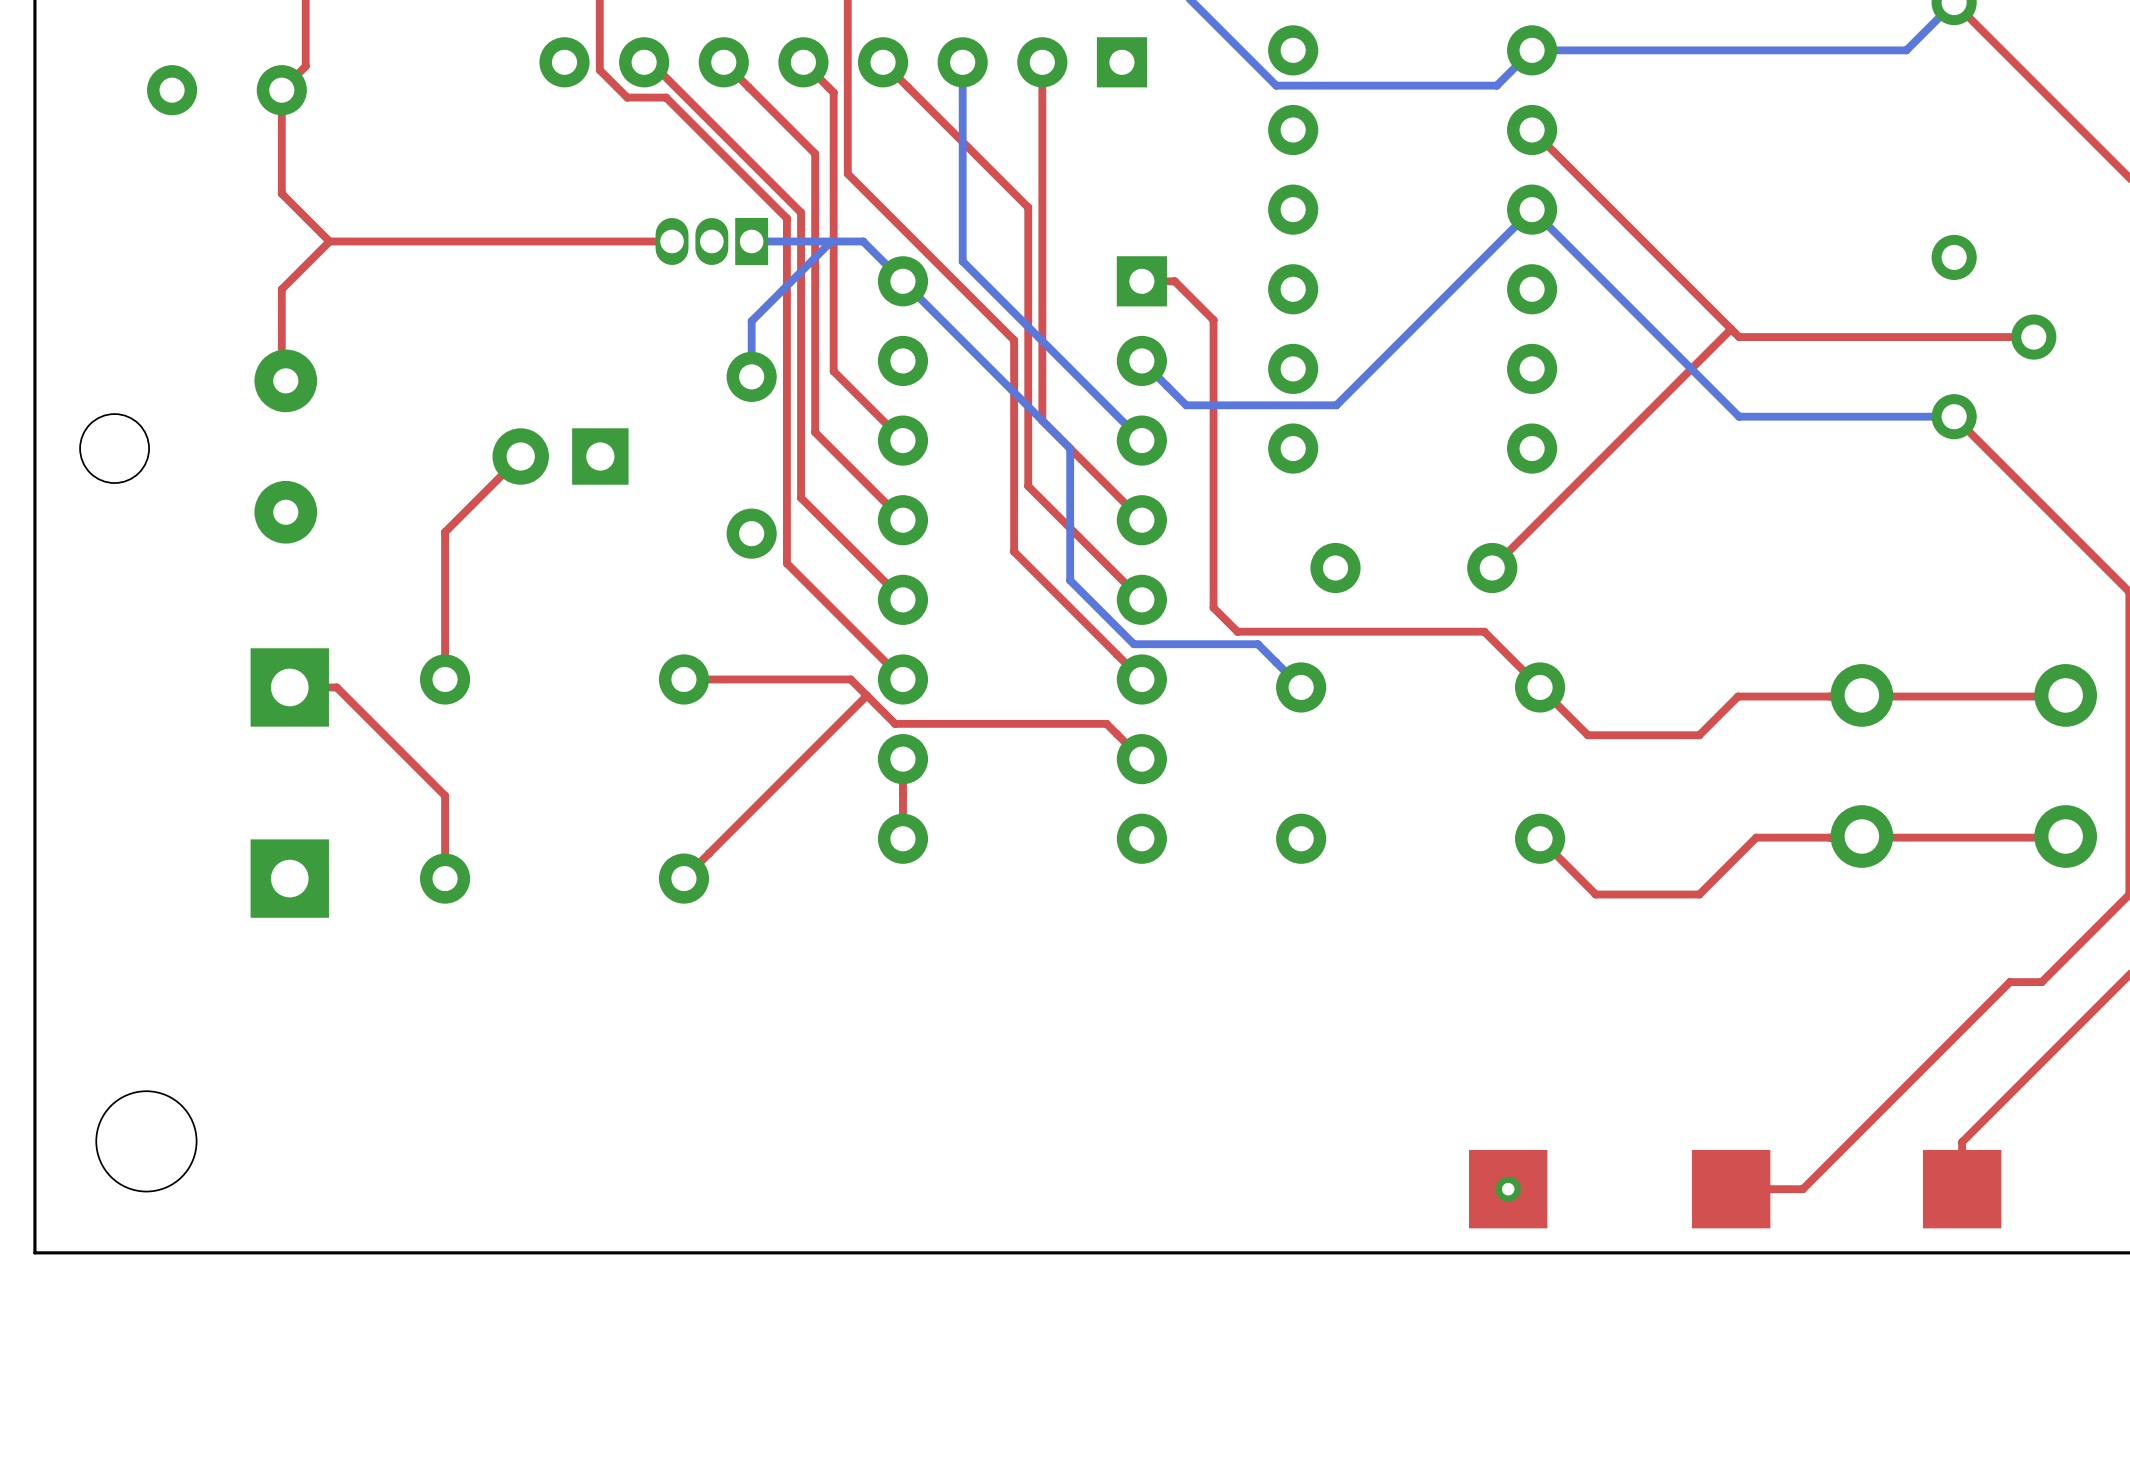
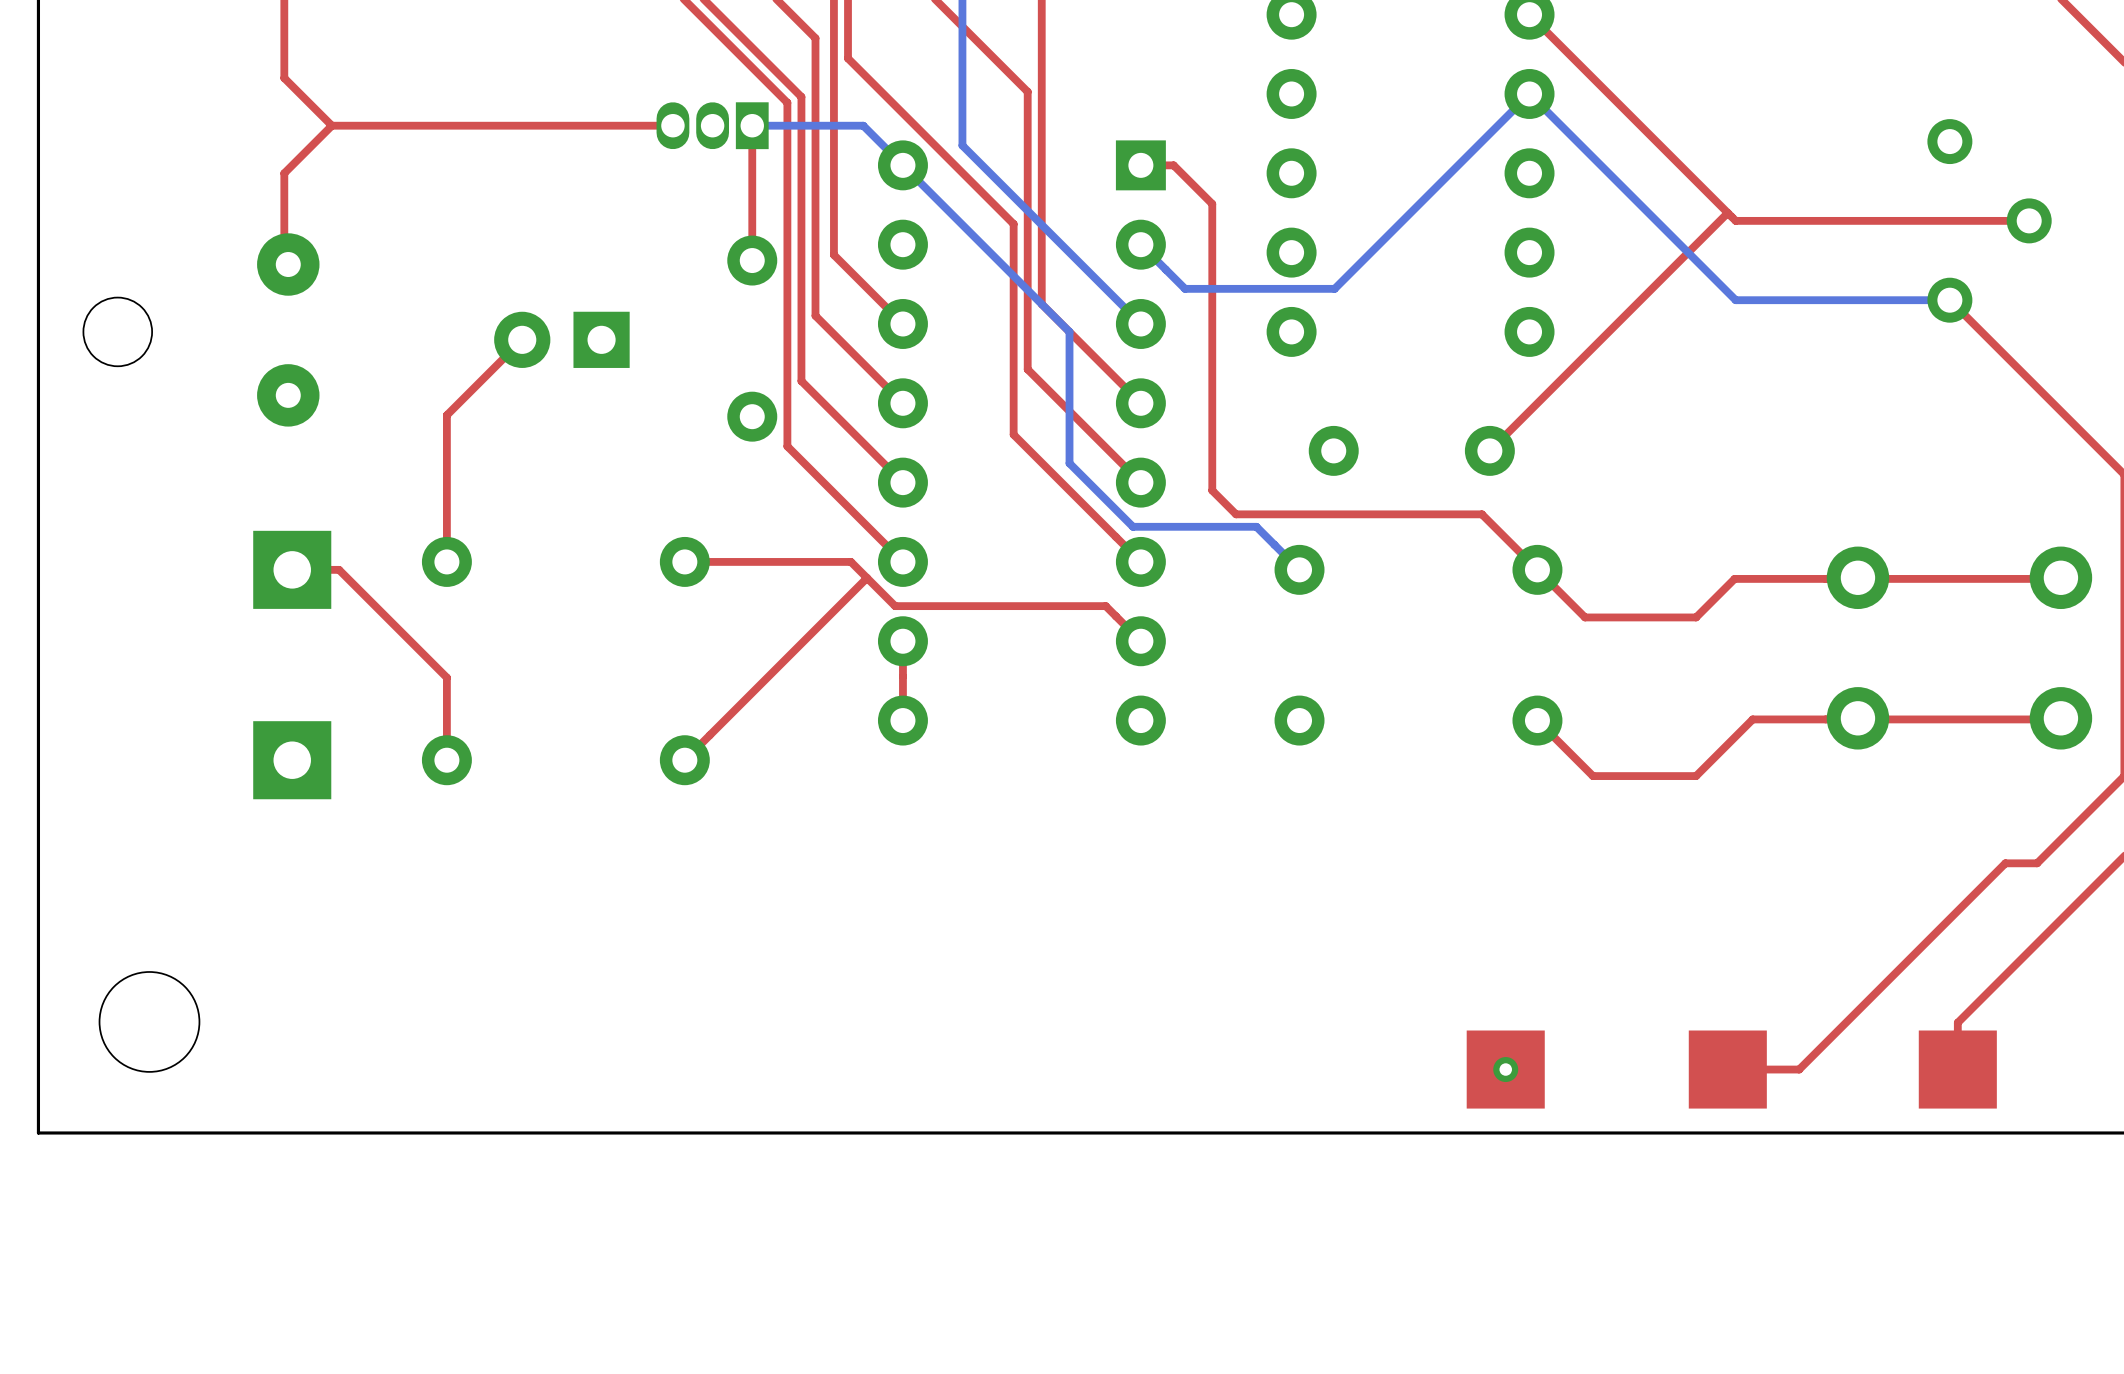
top track: none -> (752, 125) (752, 260)
bottom track: (831, 241) (751, 321) (751, 376) -> none

